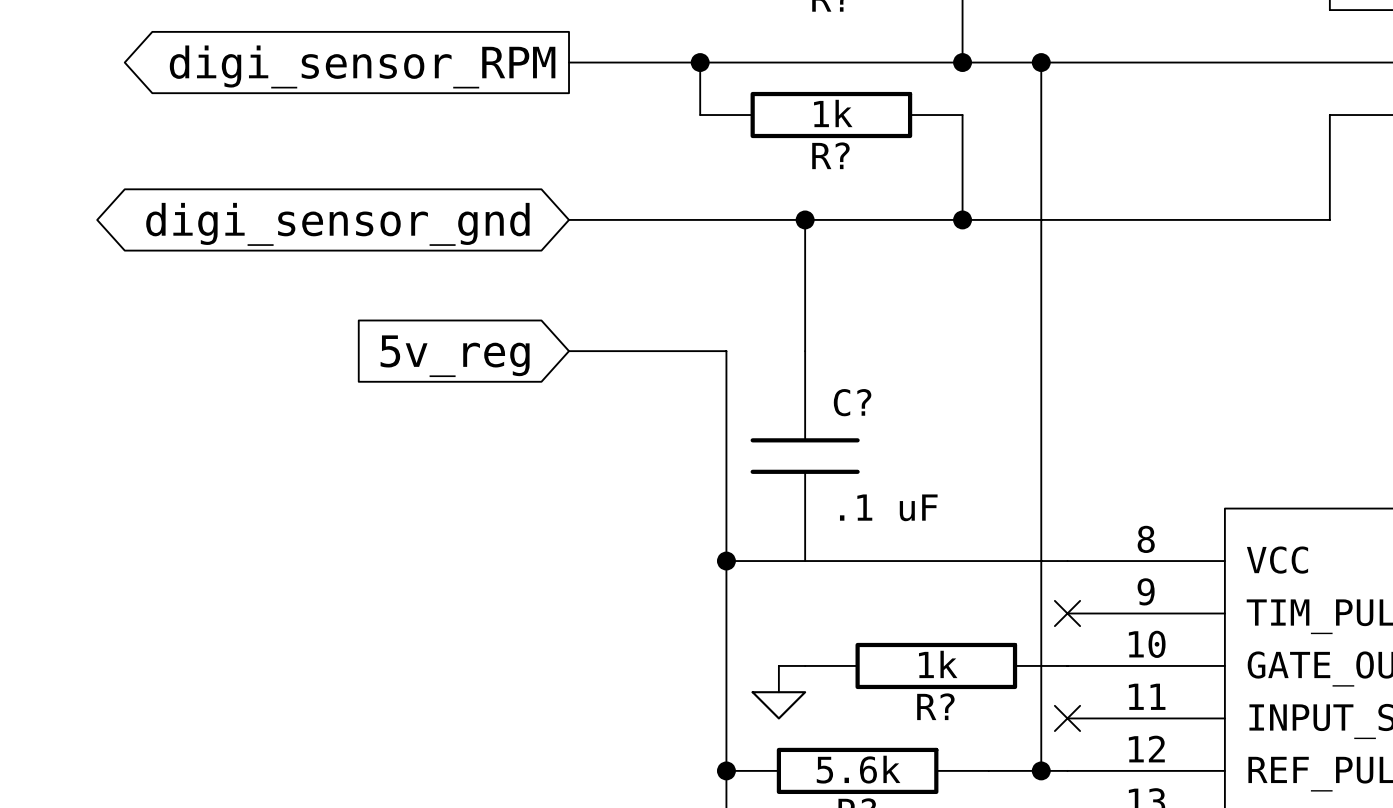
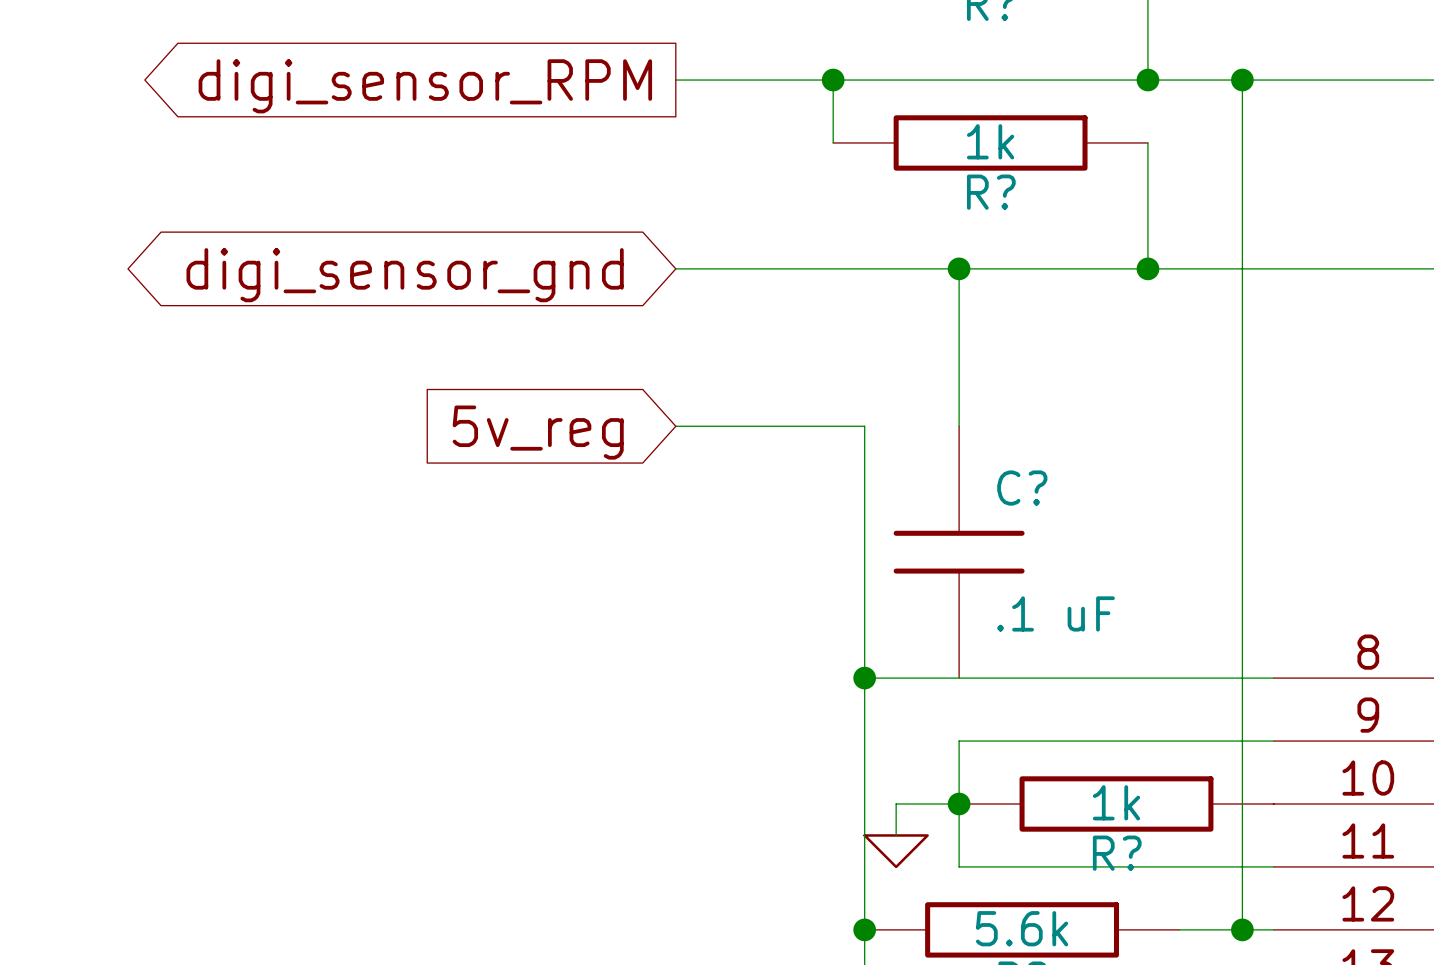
wire: none -> (1273, 741) (959, 741) (959, 866) (1273, 866)
no-connect mark: (1067, 613) -> none
wire: (778, 665) (778, 692) -> (927, 803) (896, 803) (896, 835)
junction: none -> (959, 803)
power symbol position: (778, 705) -> (896, 851)
no-connect mark: (1067, 718) -> none

